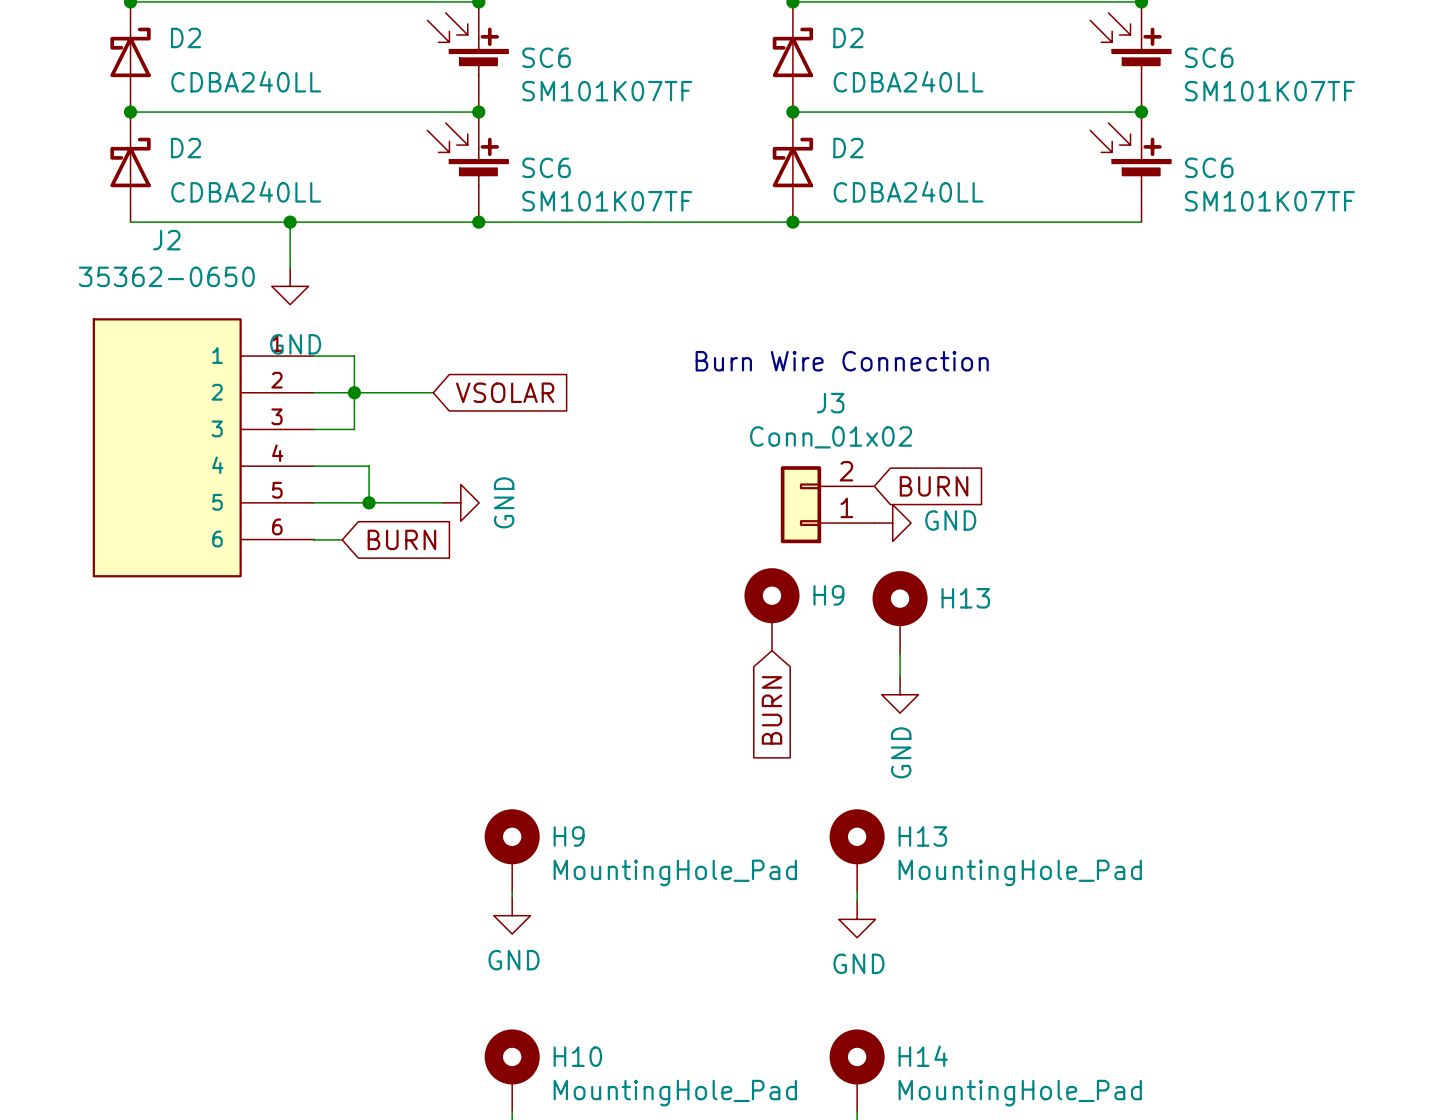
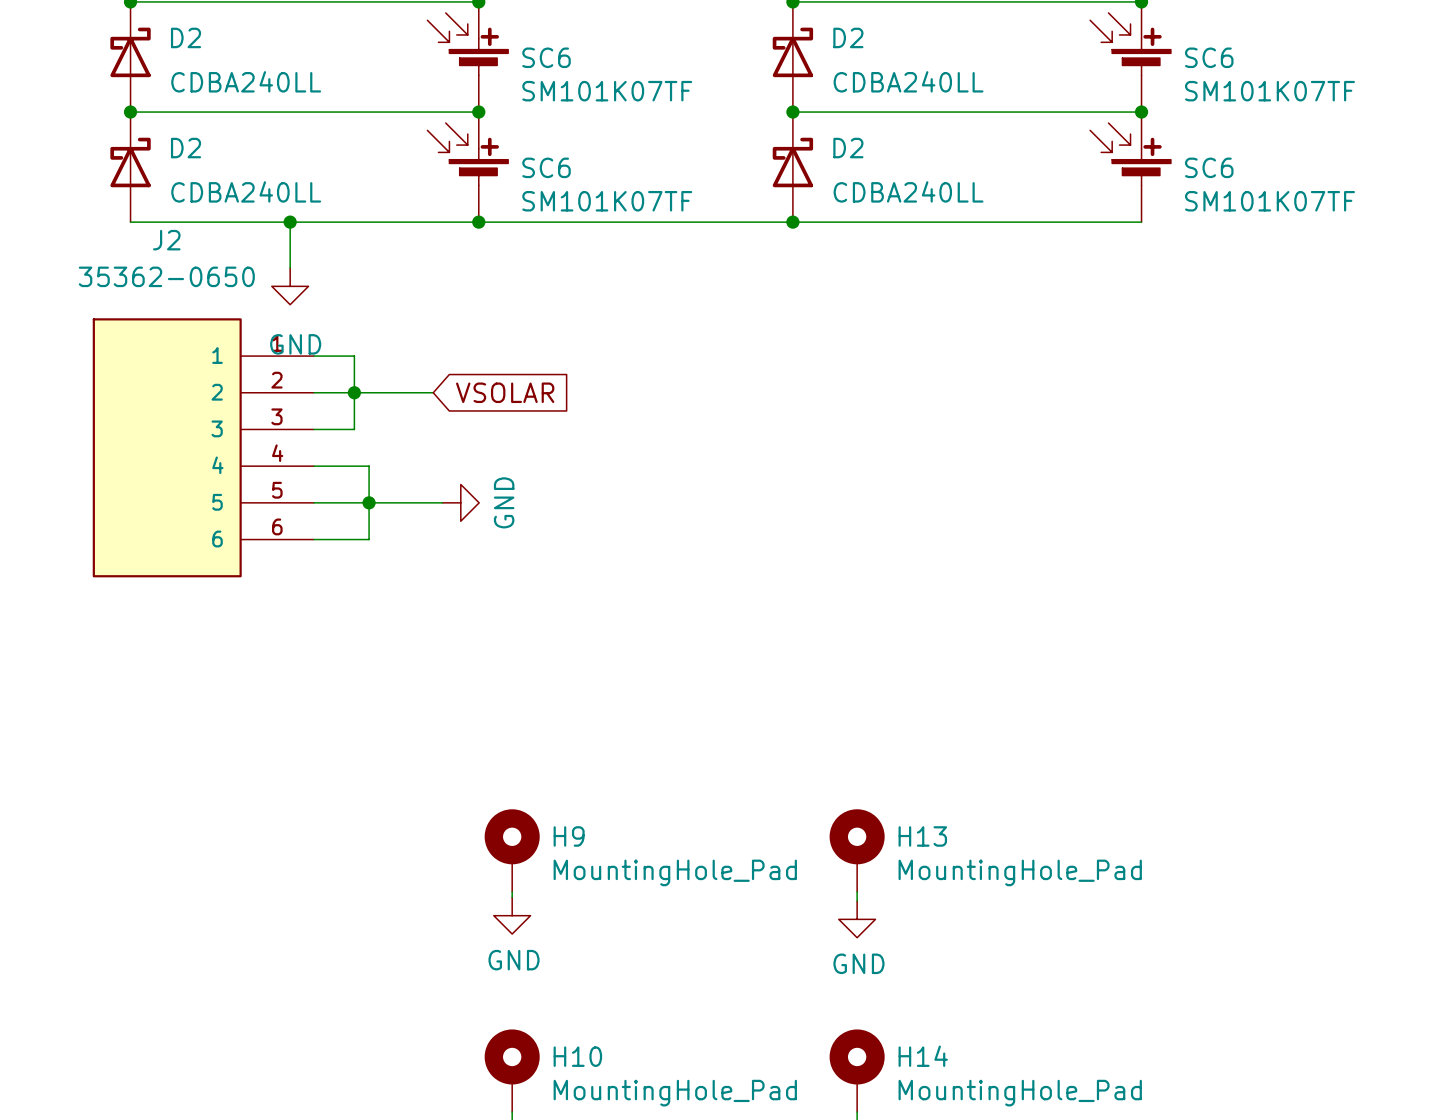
text: Burn Wire Connection (842, 361) -> none
global label: BURN (934, 486) -> none
J3: Conn_01x02 (827, 504) -> none
power symbol: GND (892, 523) -> none
wire: (314, 539) (342, 539) -> (314, 539) (369, 539) (369, 502)
global label: BURN (401, 539) -> none
H9: (771, 609) -> none
H13: (900, 612) -> none
wire: (900, 653) (900, 676) -> none
power symbol: GND (900, 694) -> none
global label: BURN (771, 710) -> none

